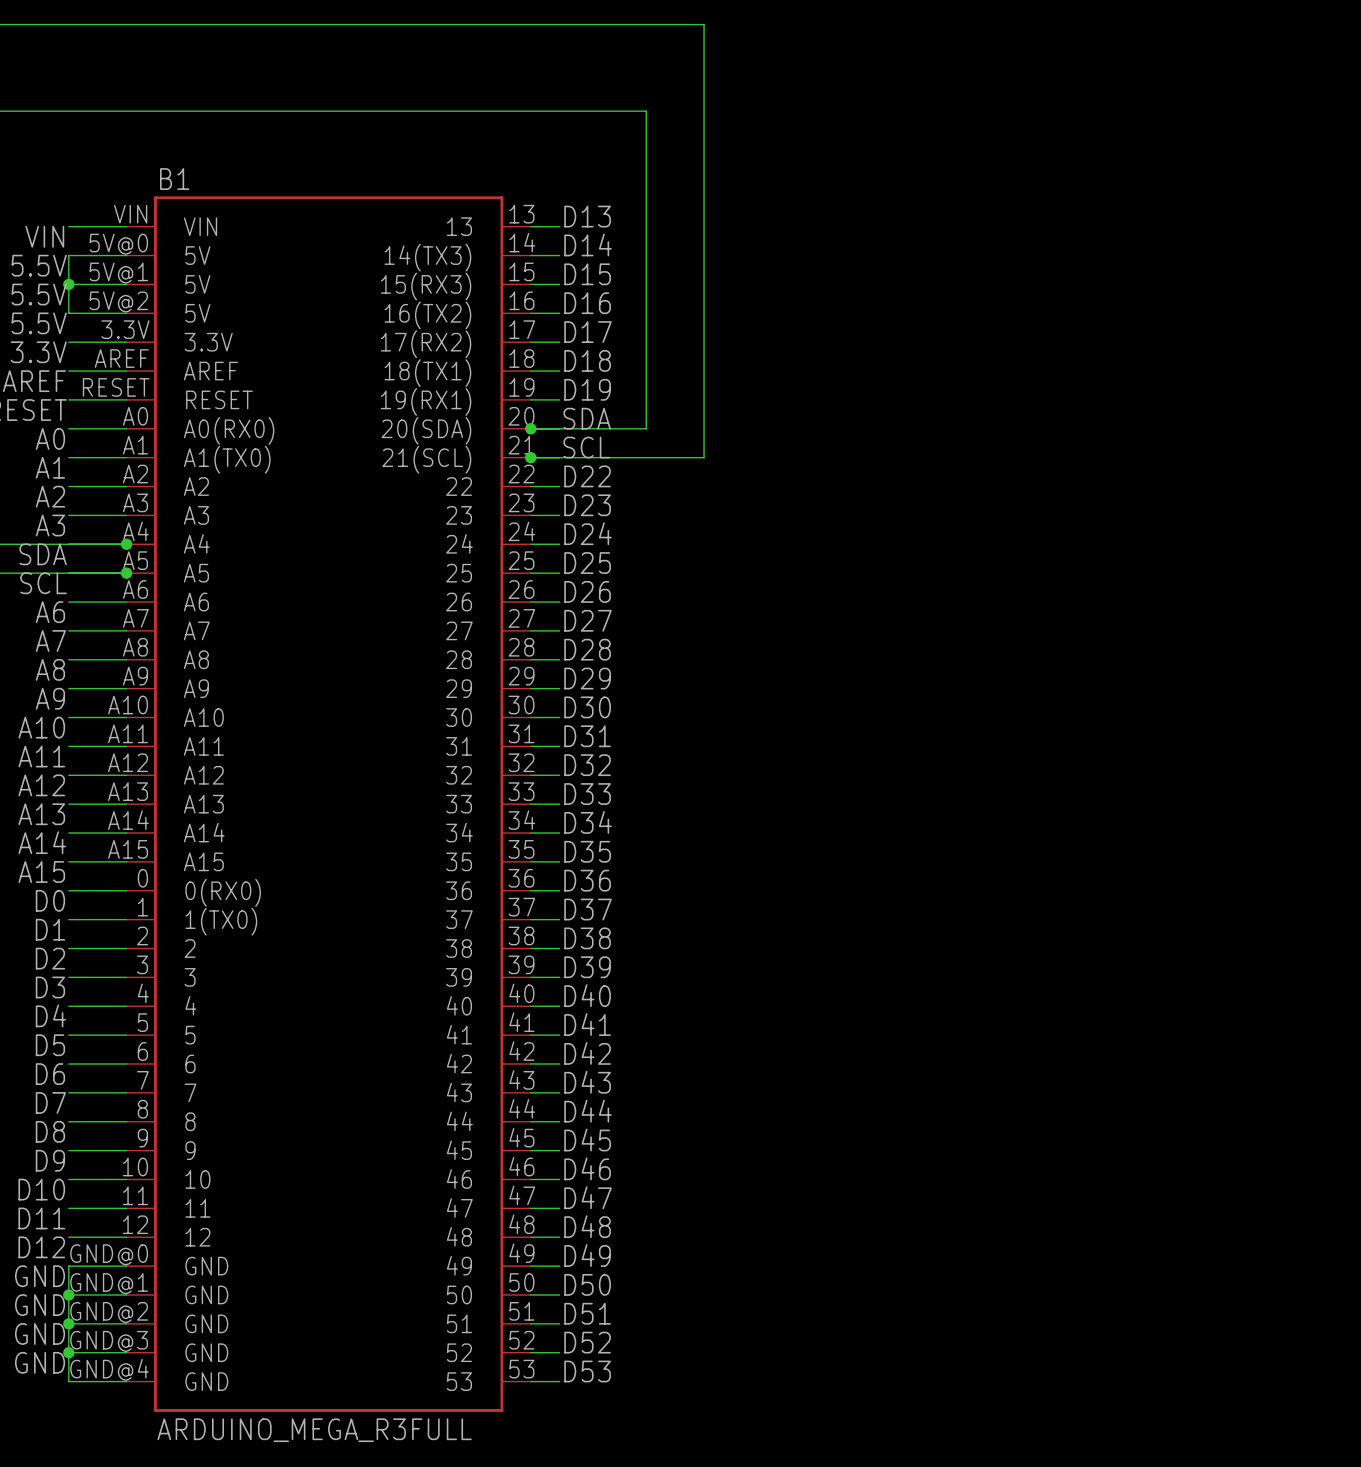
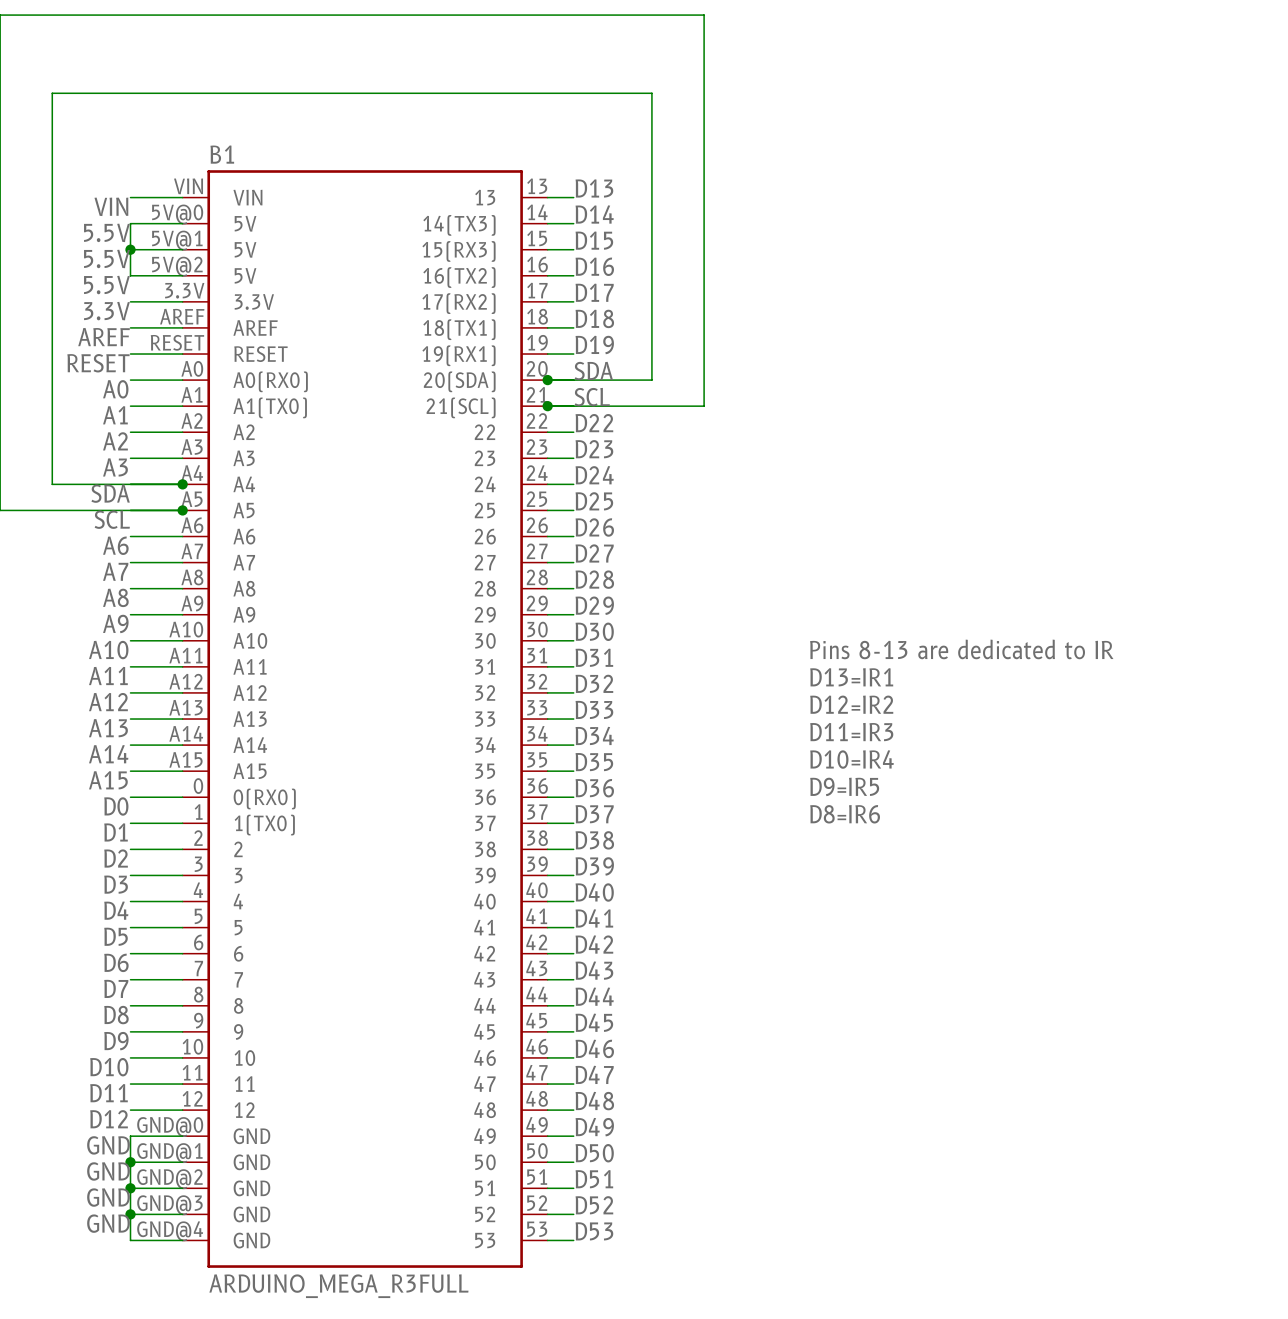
text: none -> Pins 8-13 are dedicated to IR (961, 649)
text: none -> D13=IR1 (851, 677)
text: none -> D12=IR2 (851, 704)
text: none -> D11=IR3 (851, 732)
text: none -> D10=IR4 (851, 759)
text: none -> D9=IR5 (844, 786)
text: none -> D8=IR6 (845, 814)

